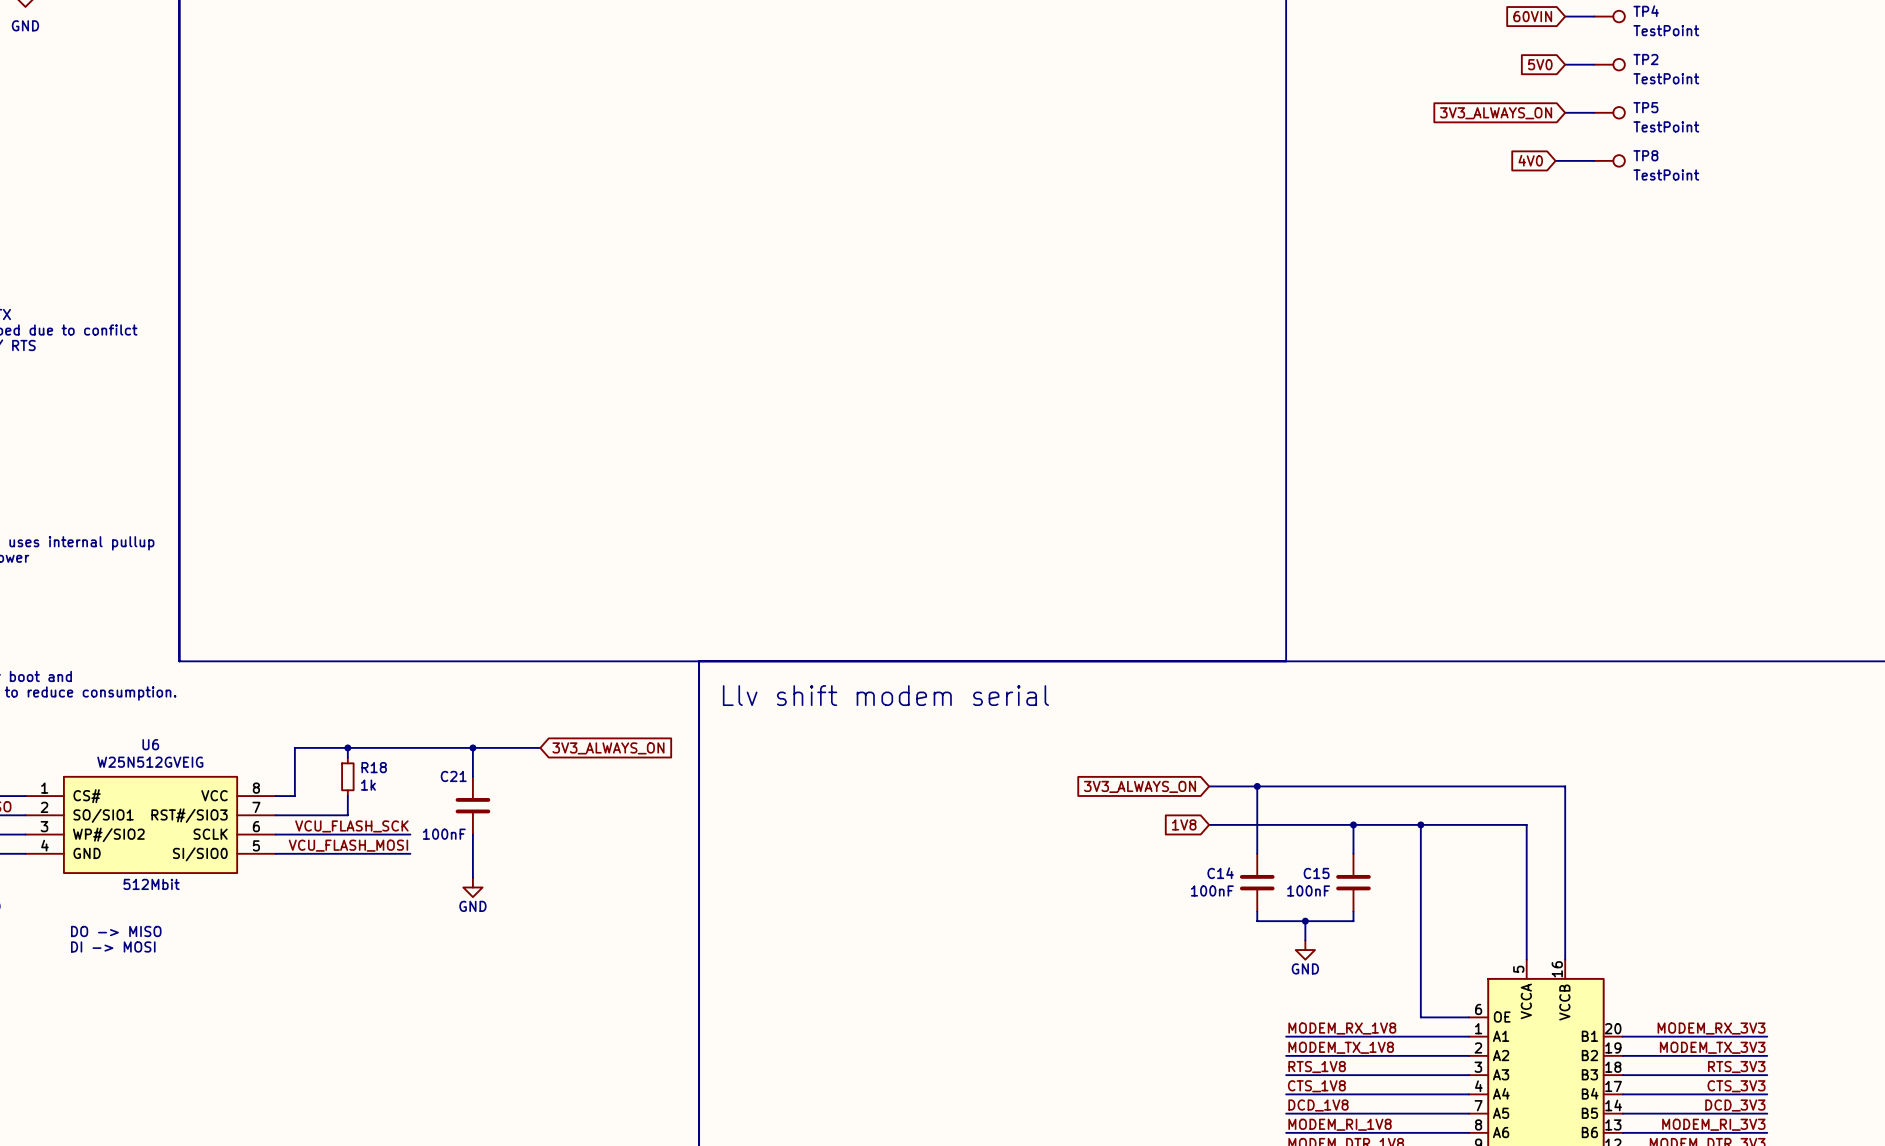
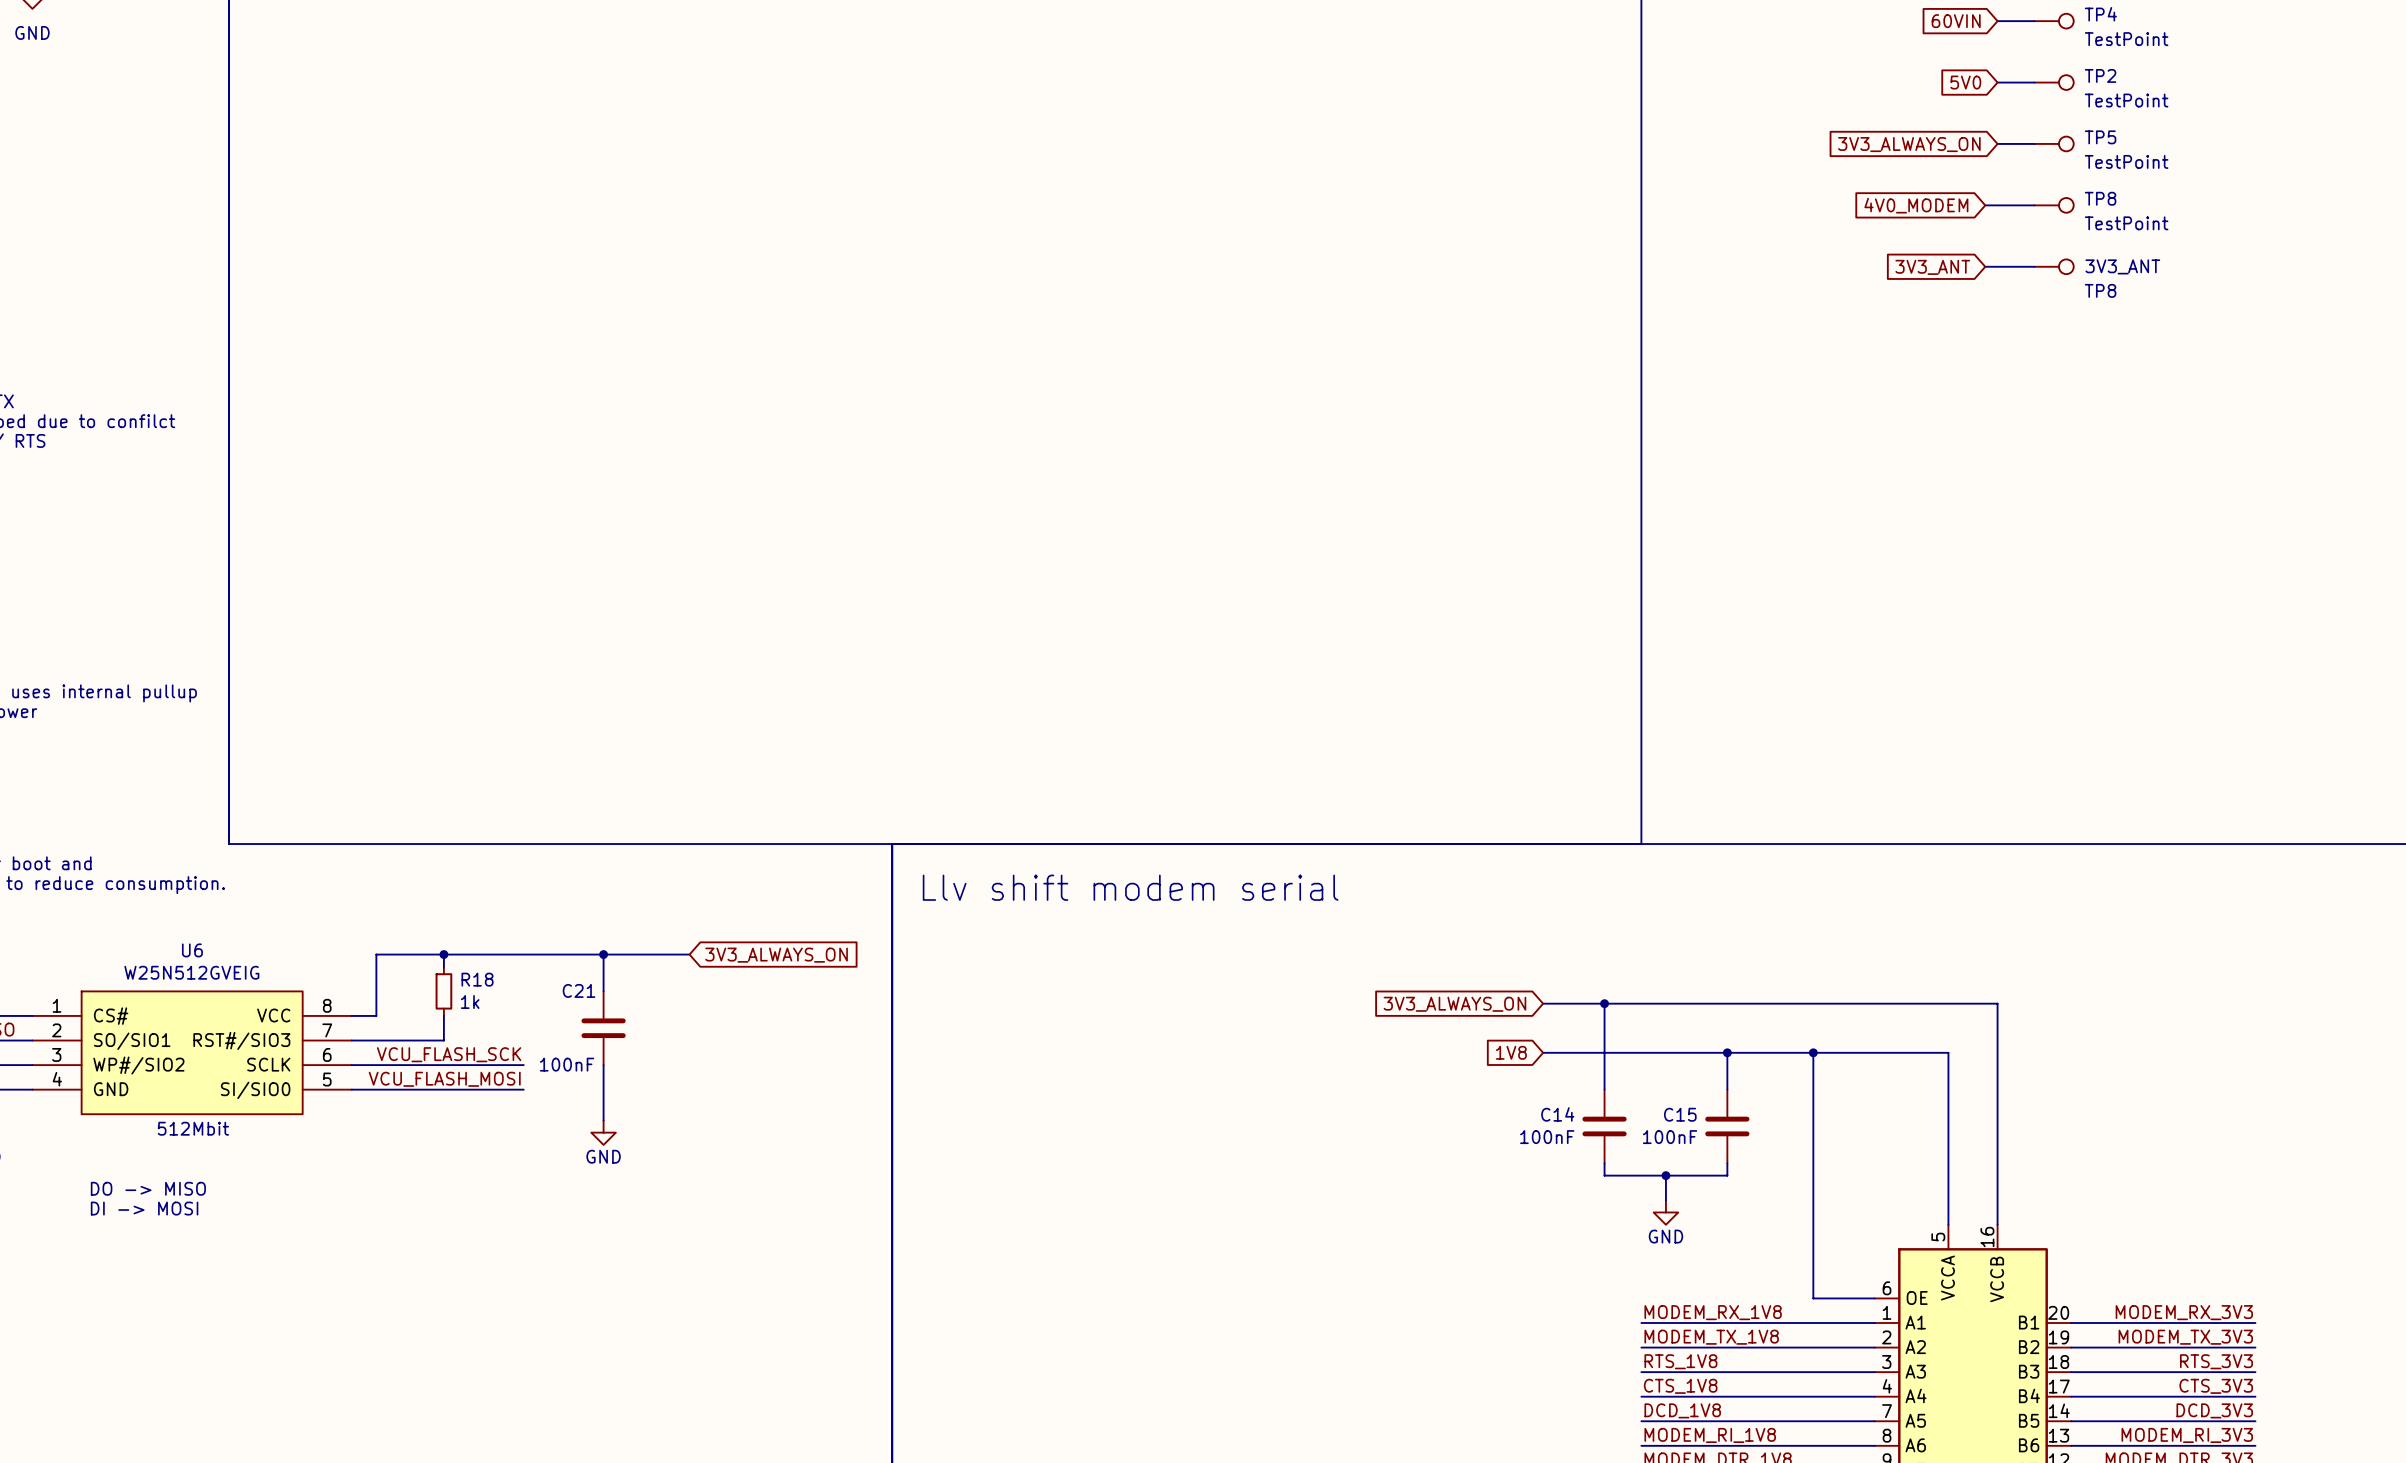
global label: 4V0 (1530, 160) -> 4V0_MODEM (1916, 205)
global label: none -> 3V3_ANT (1932, 267)
wire: none -> (1985, 266) (2034, 266)
TP8: none -> 3V3_ANT (2054, 266)

